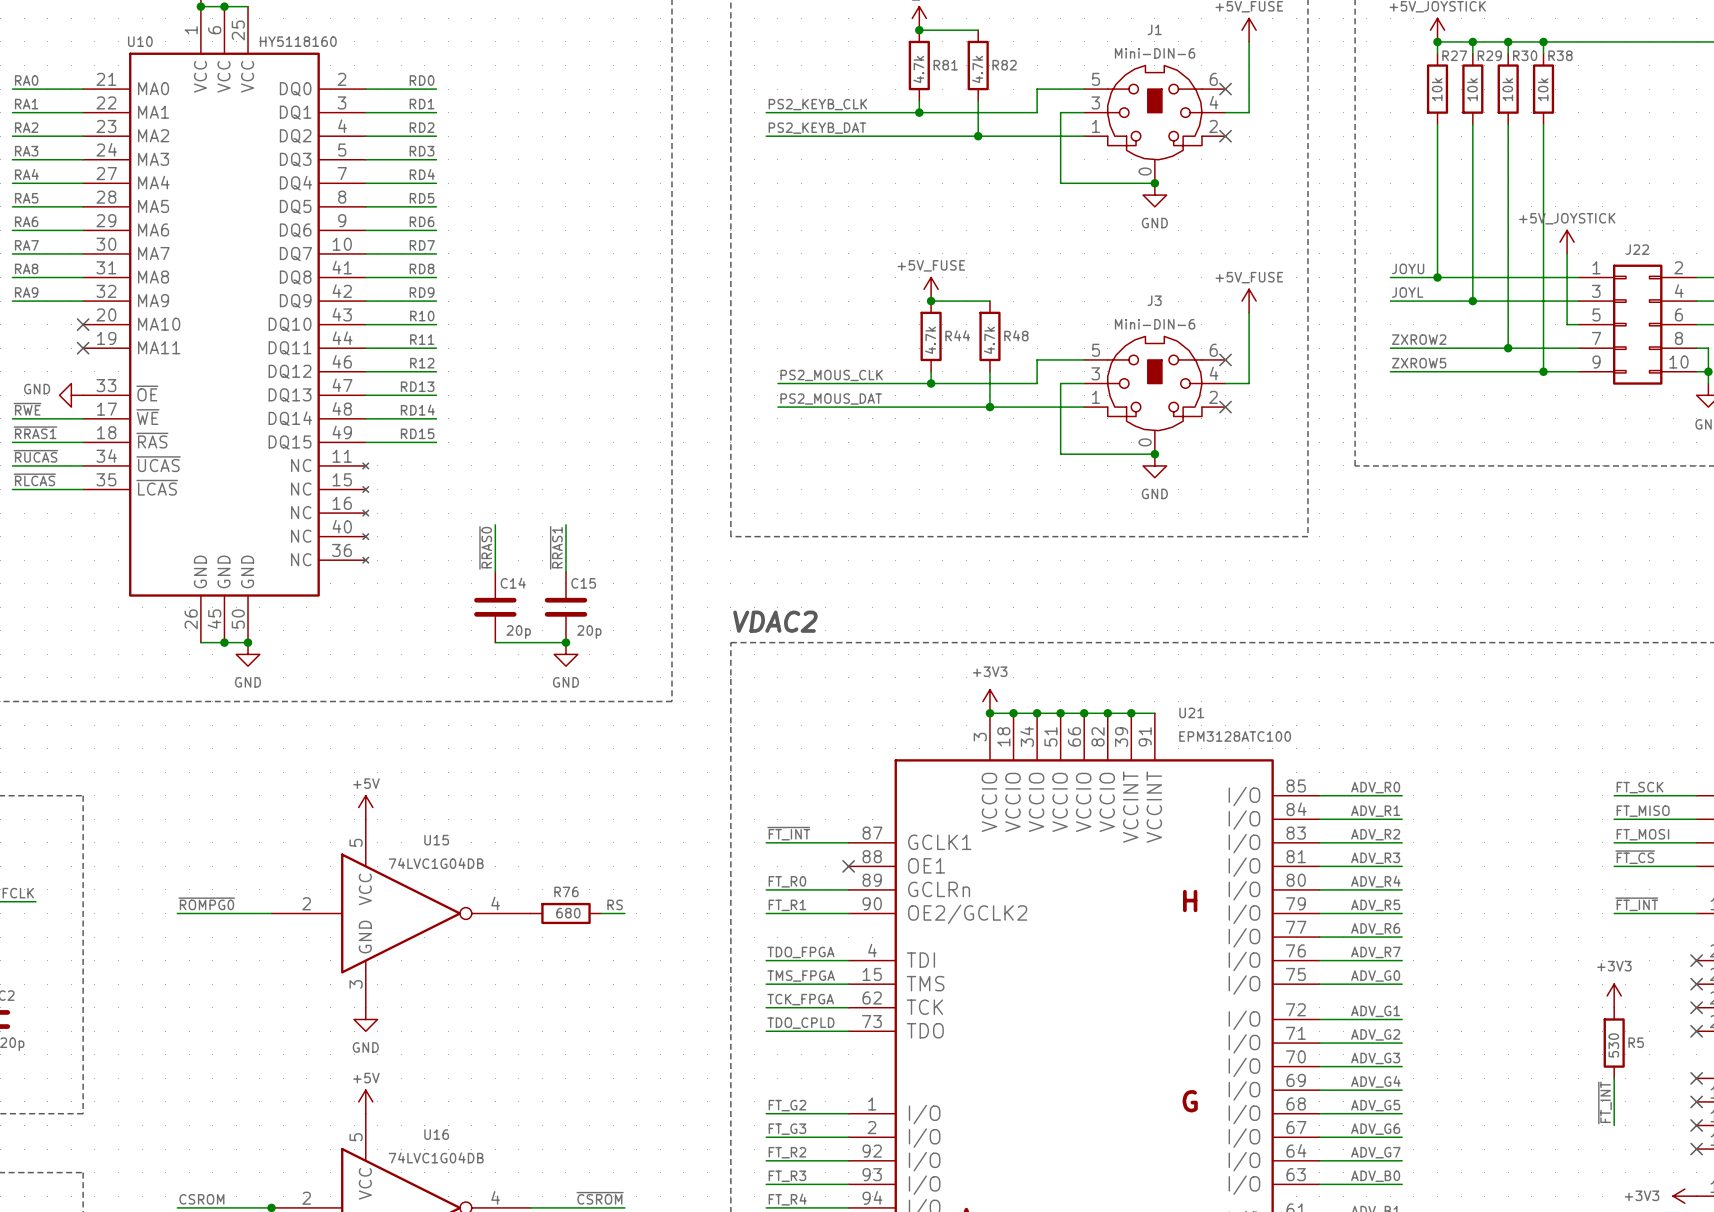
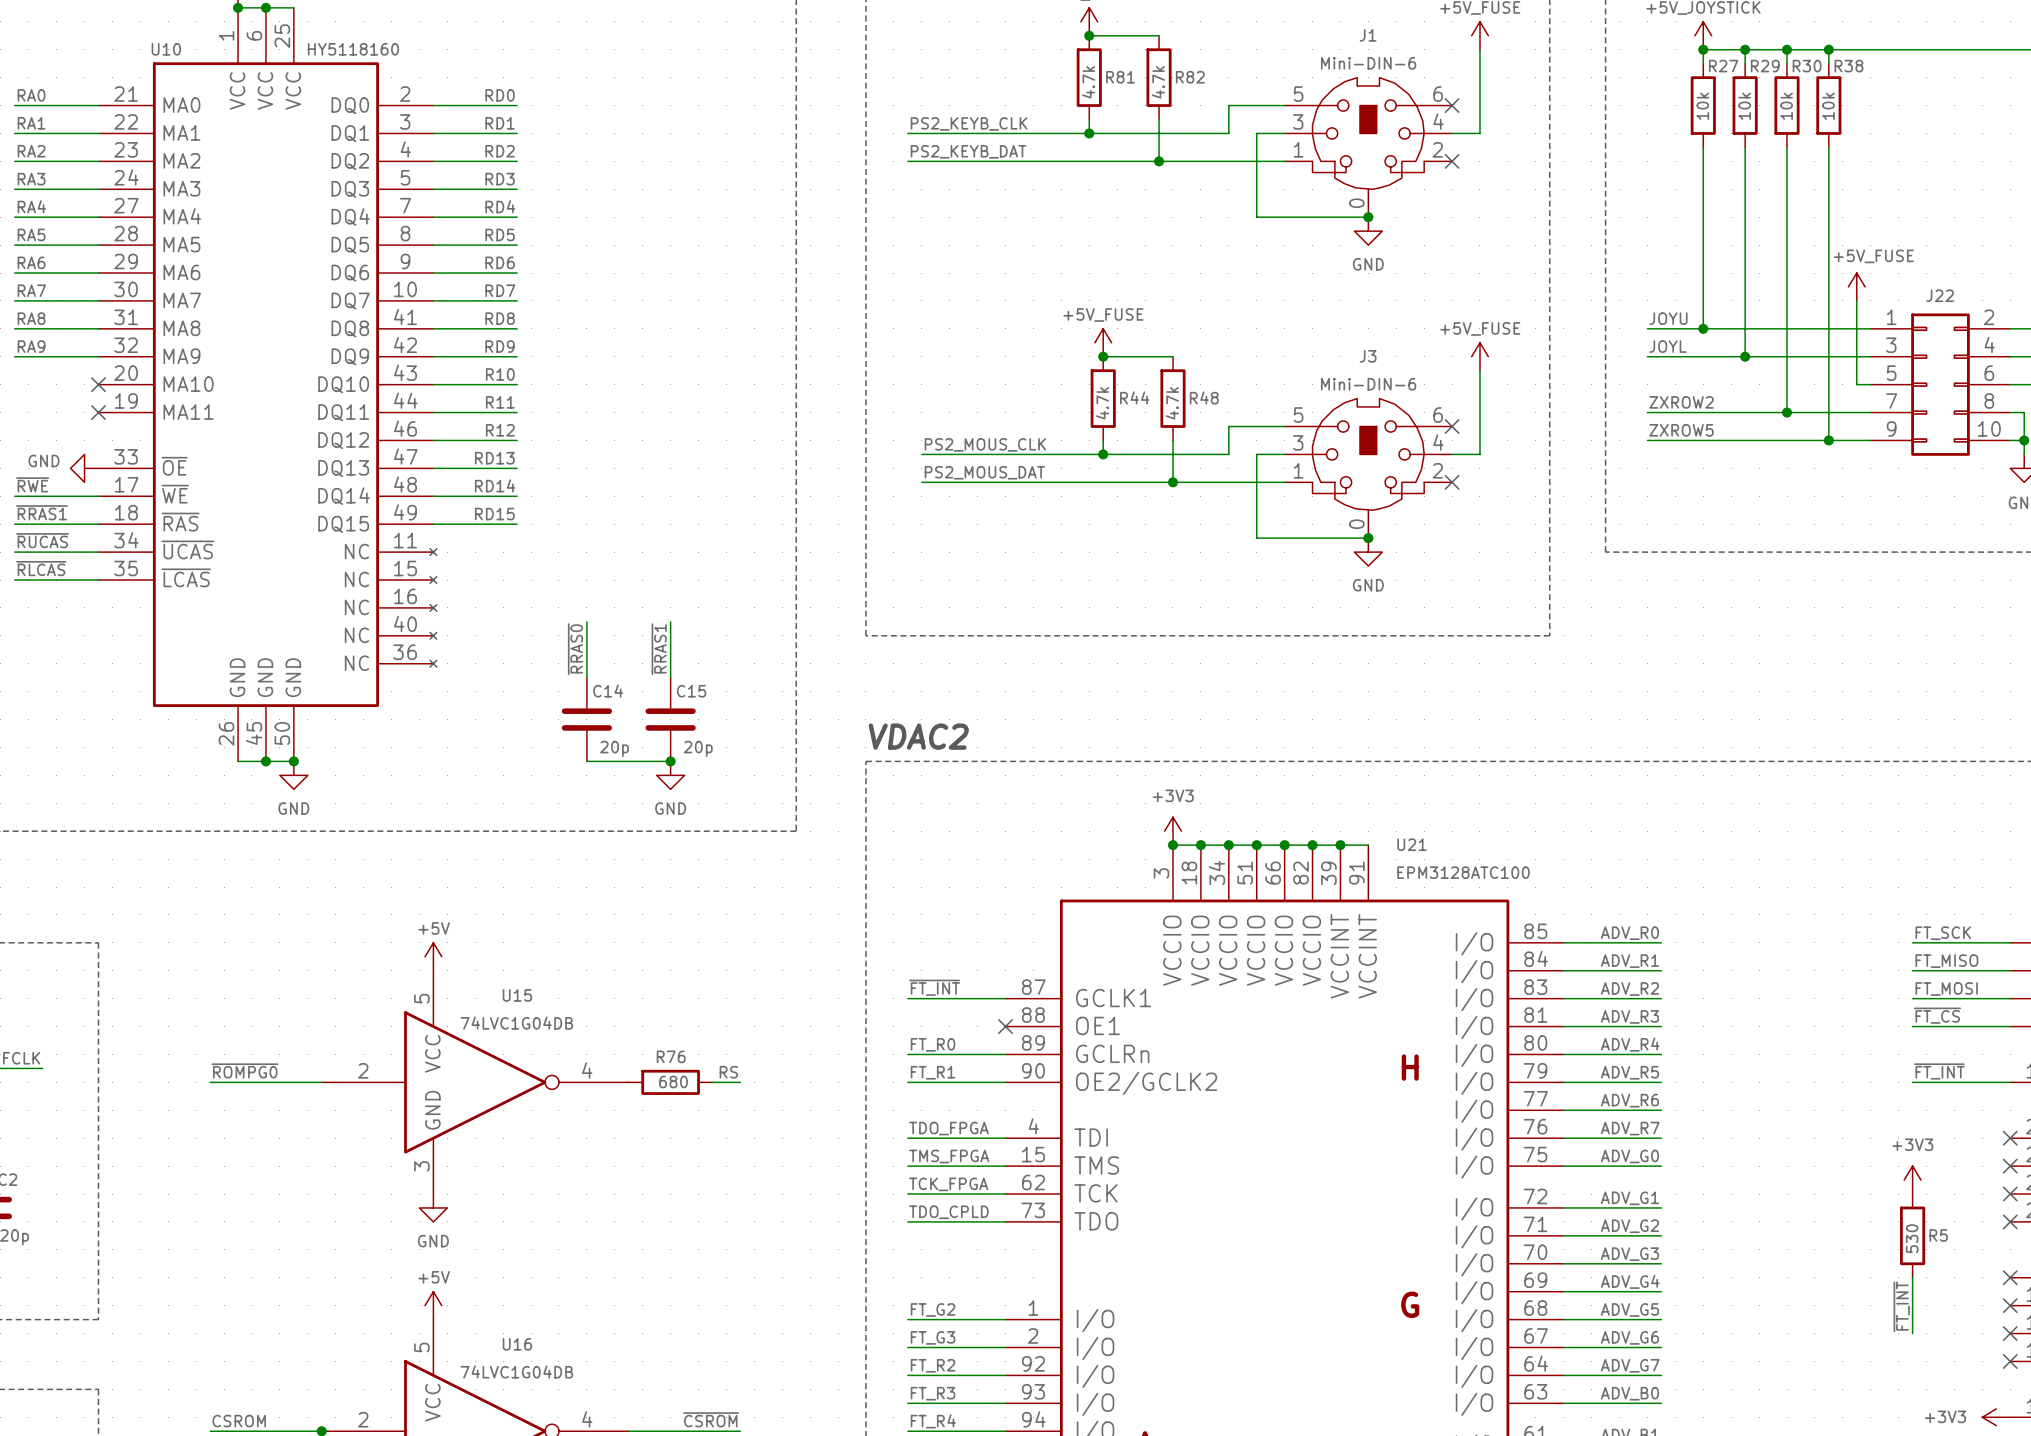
power symbol: +5V_JOYSTICK (1567, 242) -> +5V_FUSE (1856, 286)

